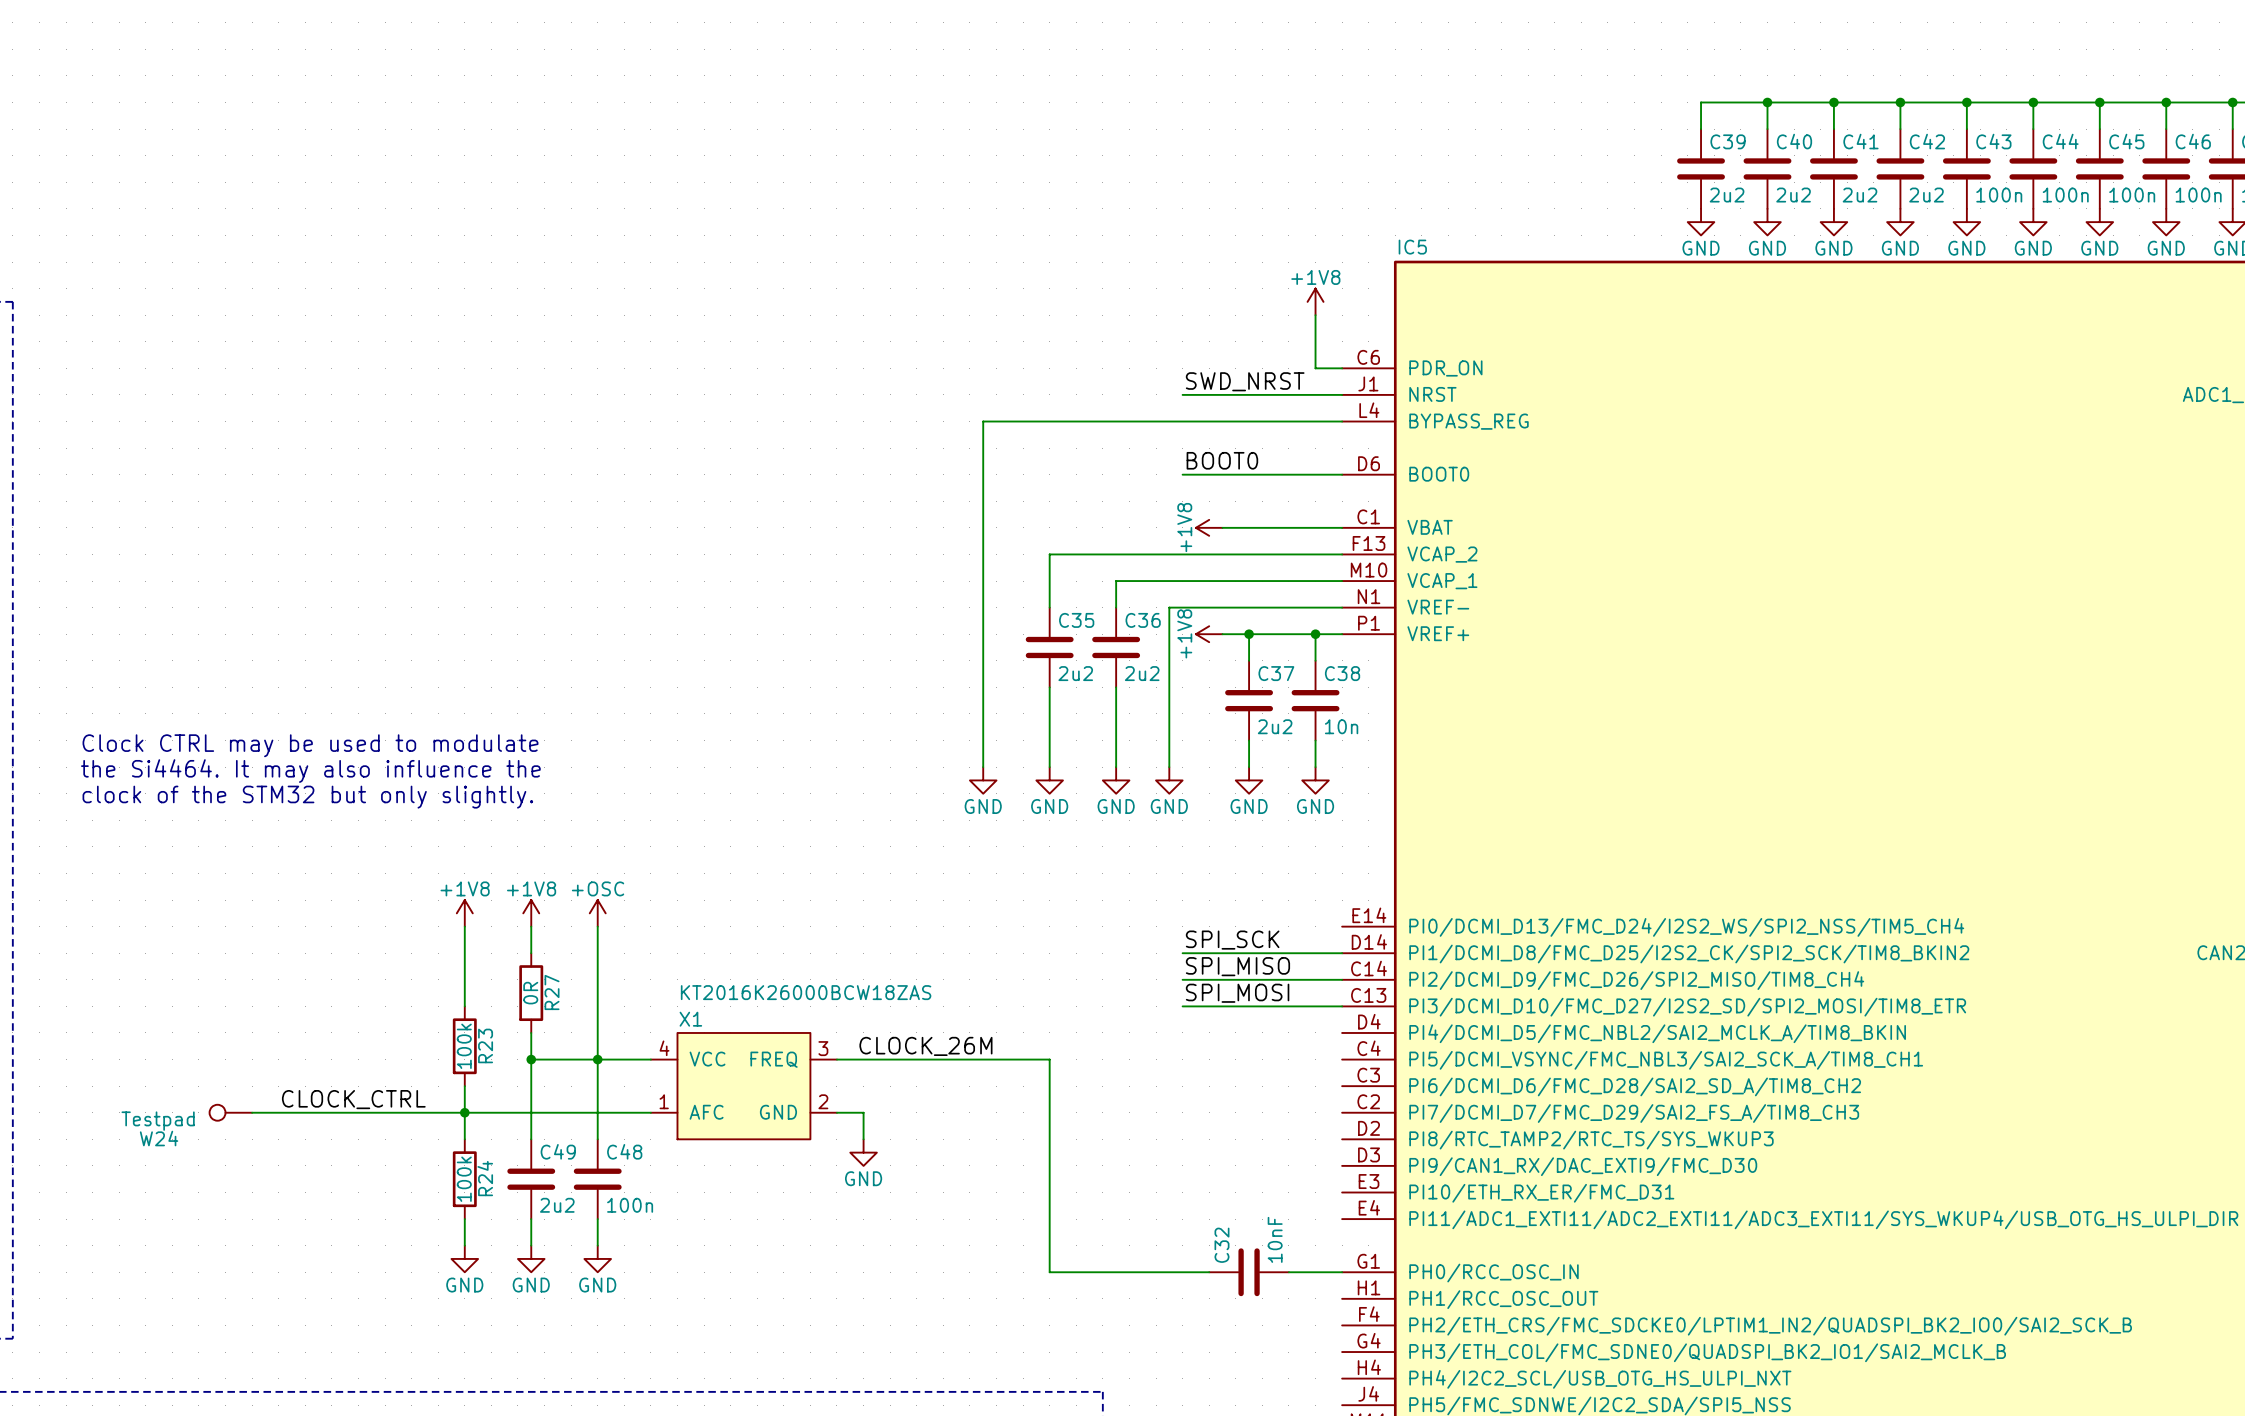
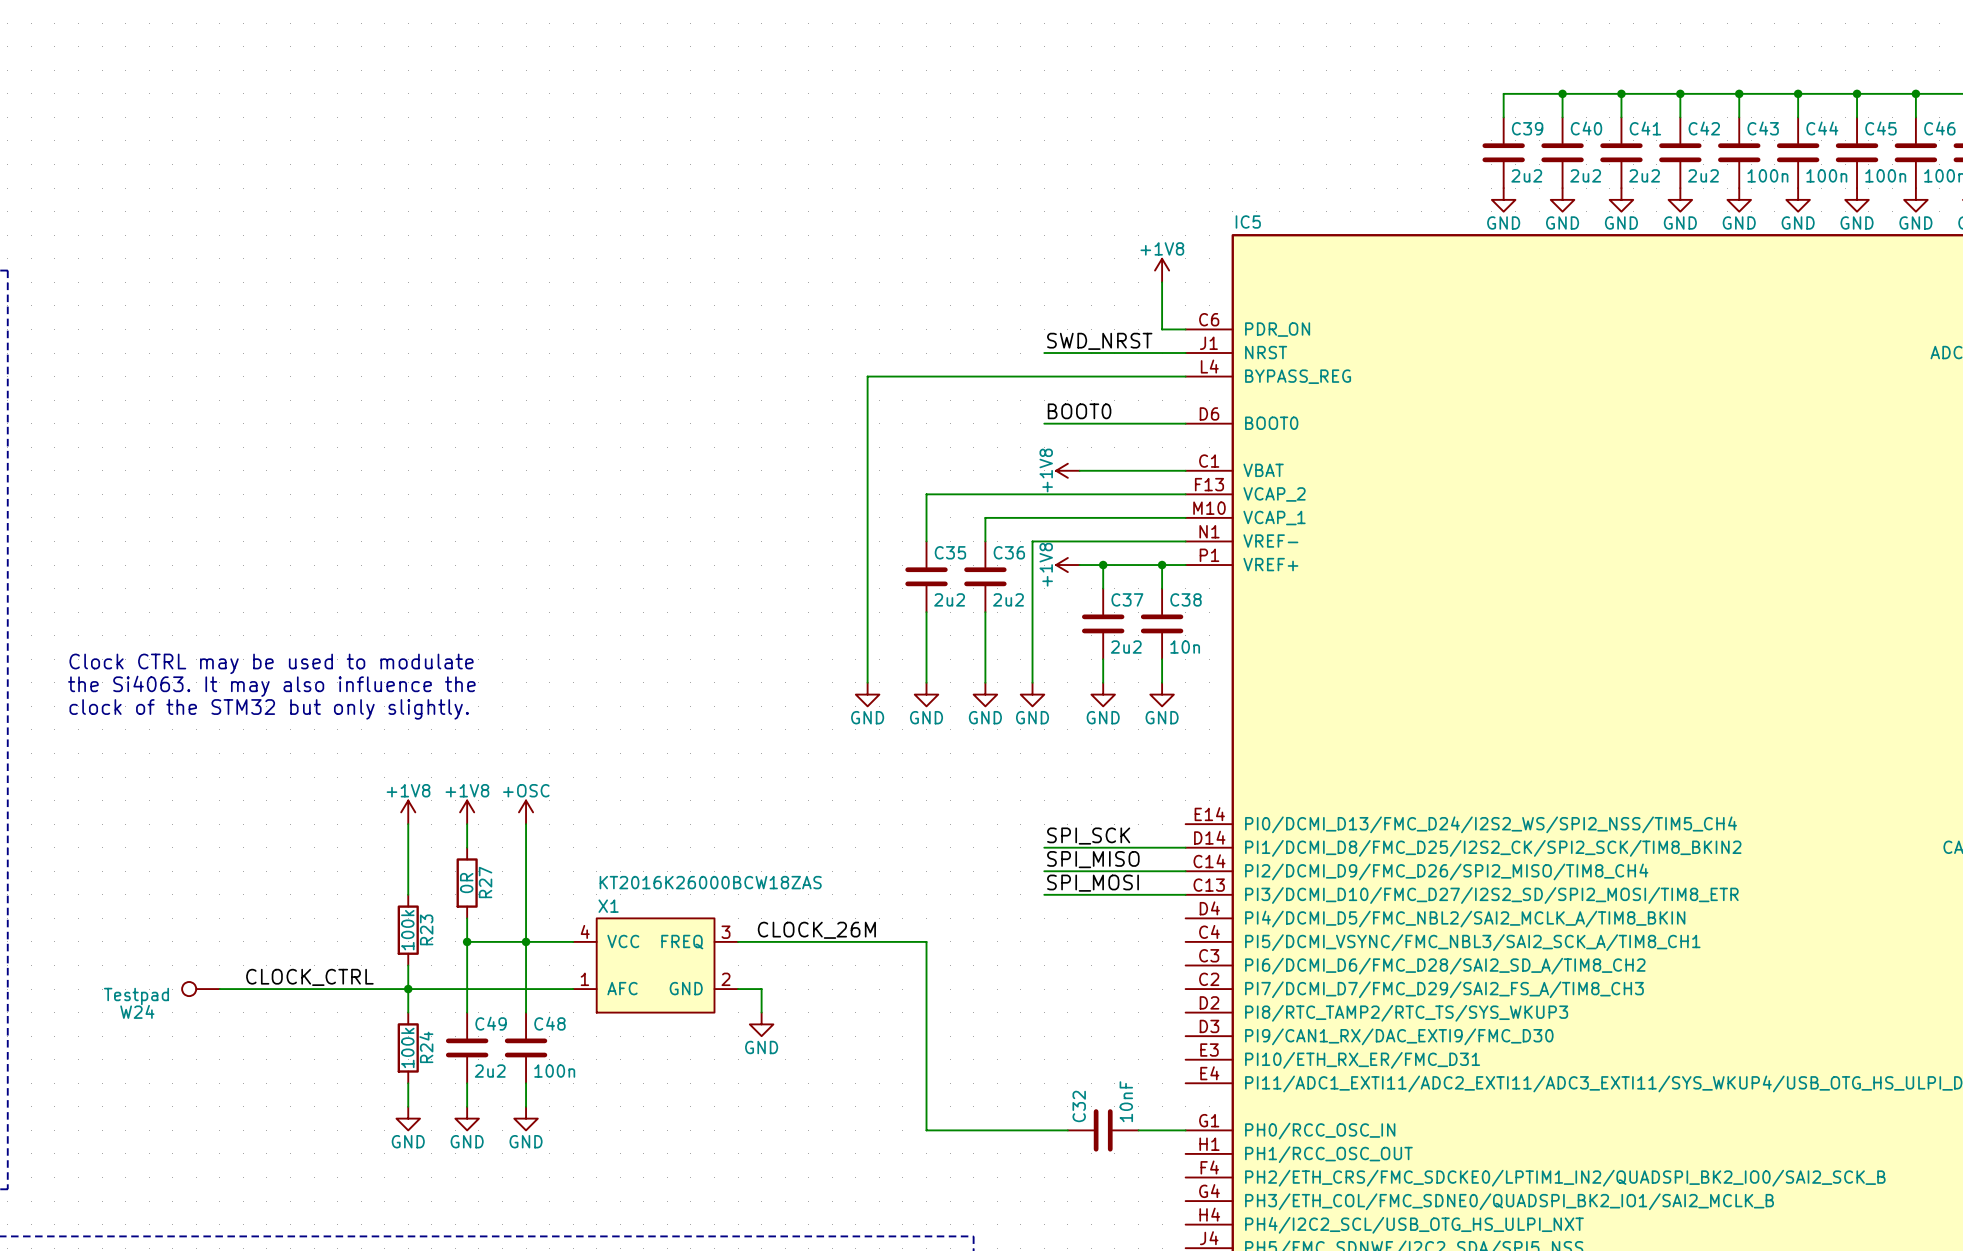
text: the Si4464. It may also influence the (310, 771) -> the Si4063. It may also influence the (271, 686)

